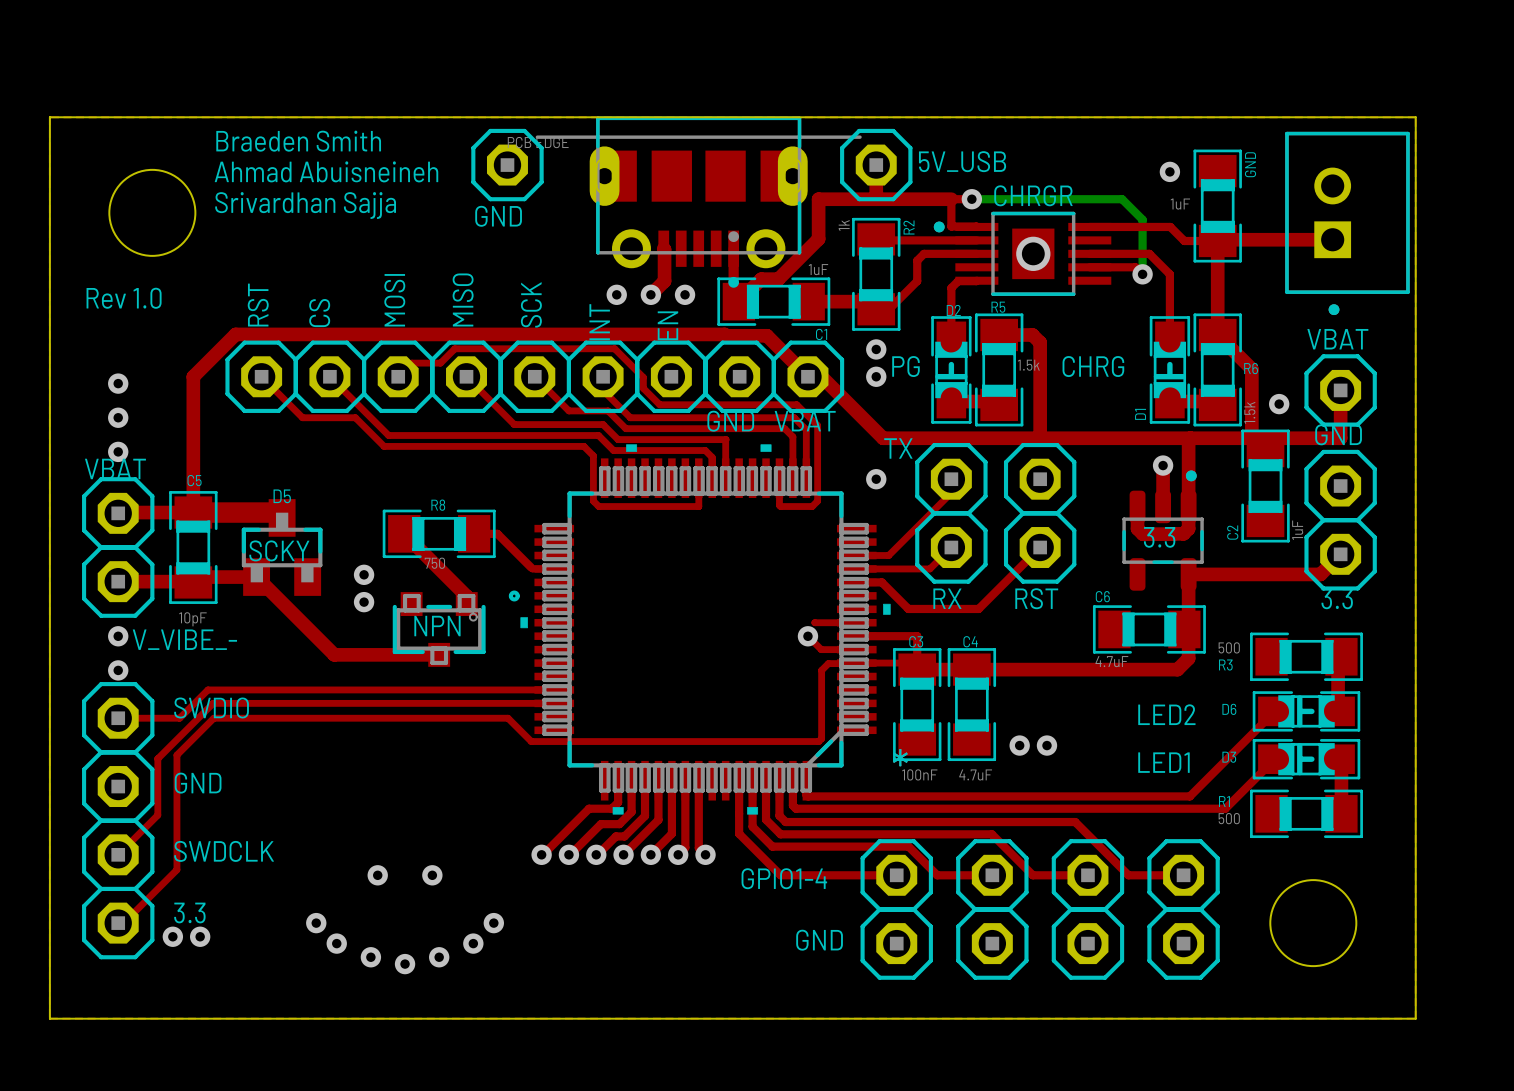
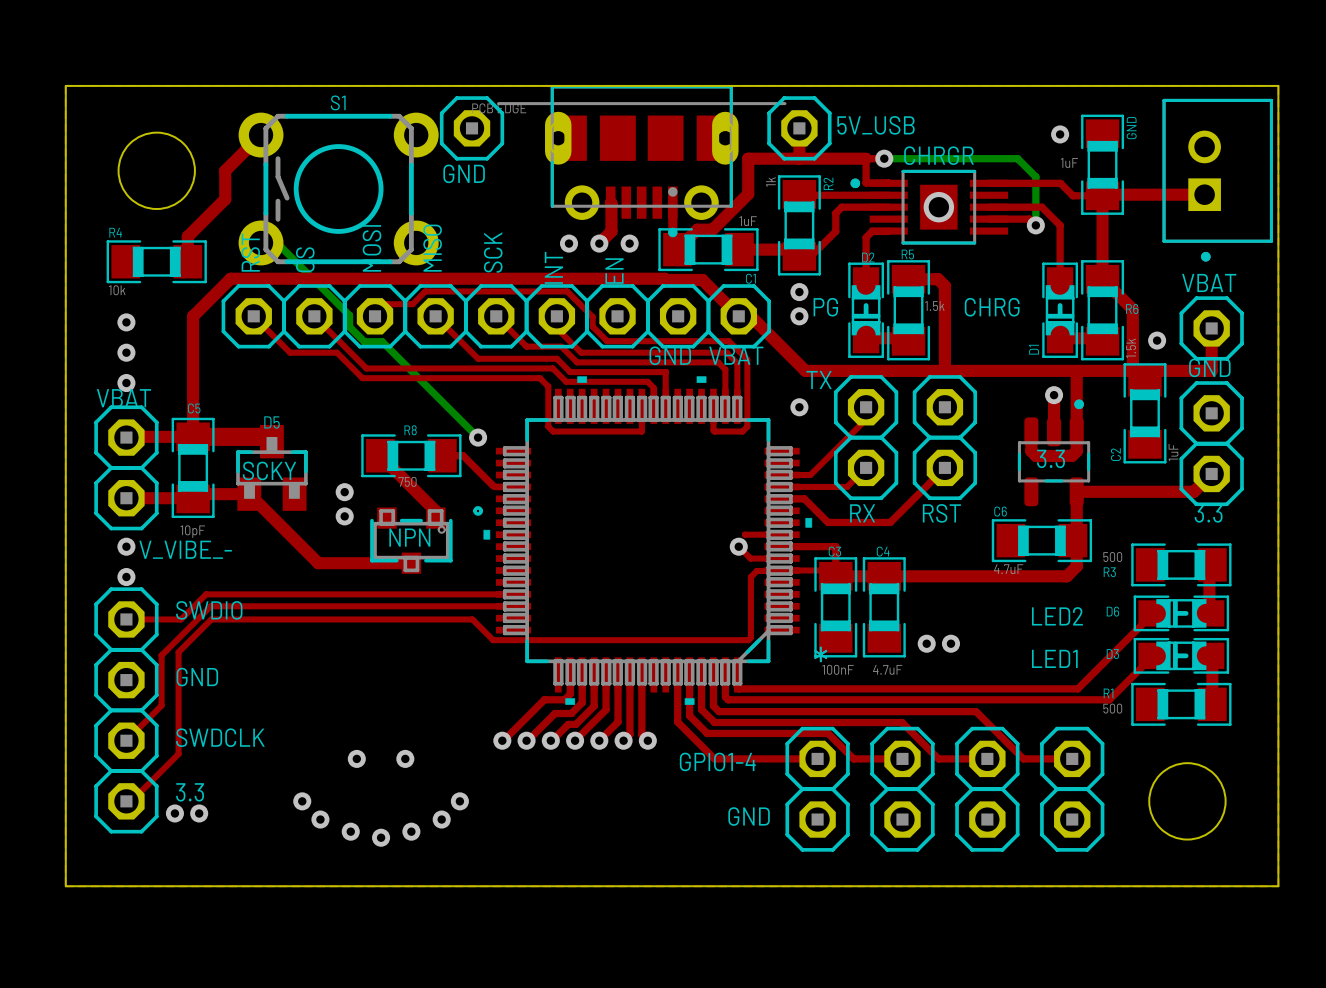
text: Braeden Smith (298, 141) -> none
text: Ahmad Abuisneineh (326, 171) -> none
top track: none -> (261, 135) (225, 170) (225, 199) (187, 236) (187, 261)
text: Srivardhan Sajja (305, 205) -> none
S1: none -> (338, 189)
bottom track: none -> (261, 242) (277, 242) (349, 315) (349, 326) (364, 341) (382, 341) (478, 437)
text: Rev 1.0 (124, 298) -> none
R4: none -> 10k (156, 261)
via: none -> (478, 437)

